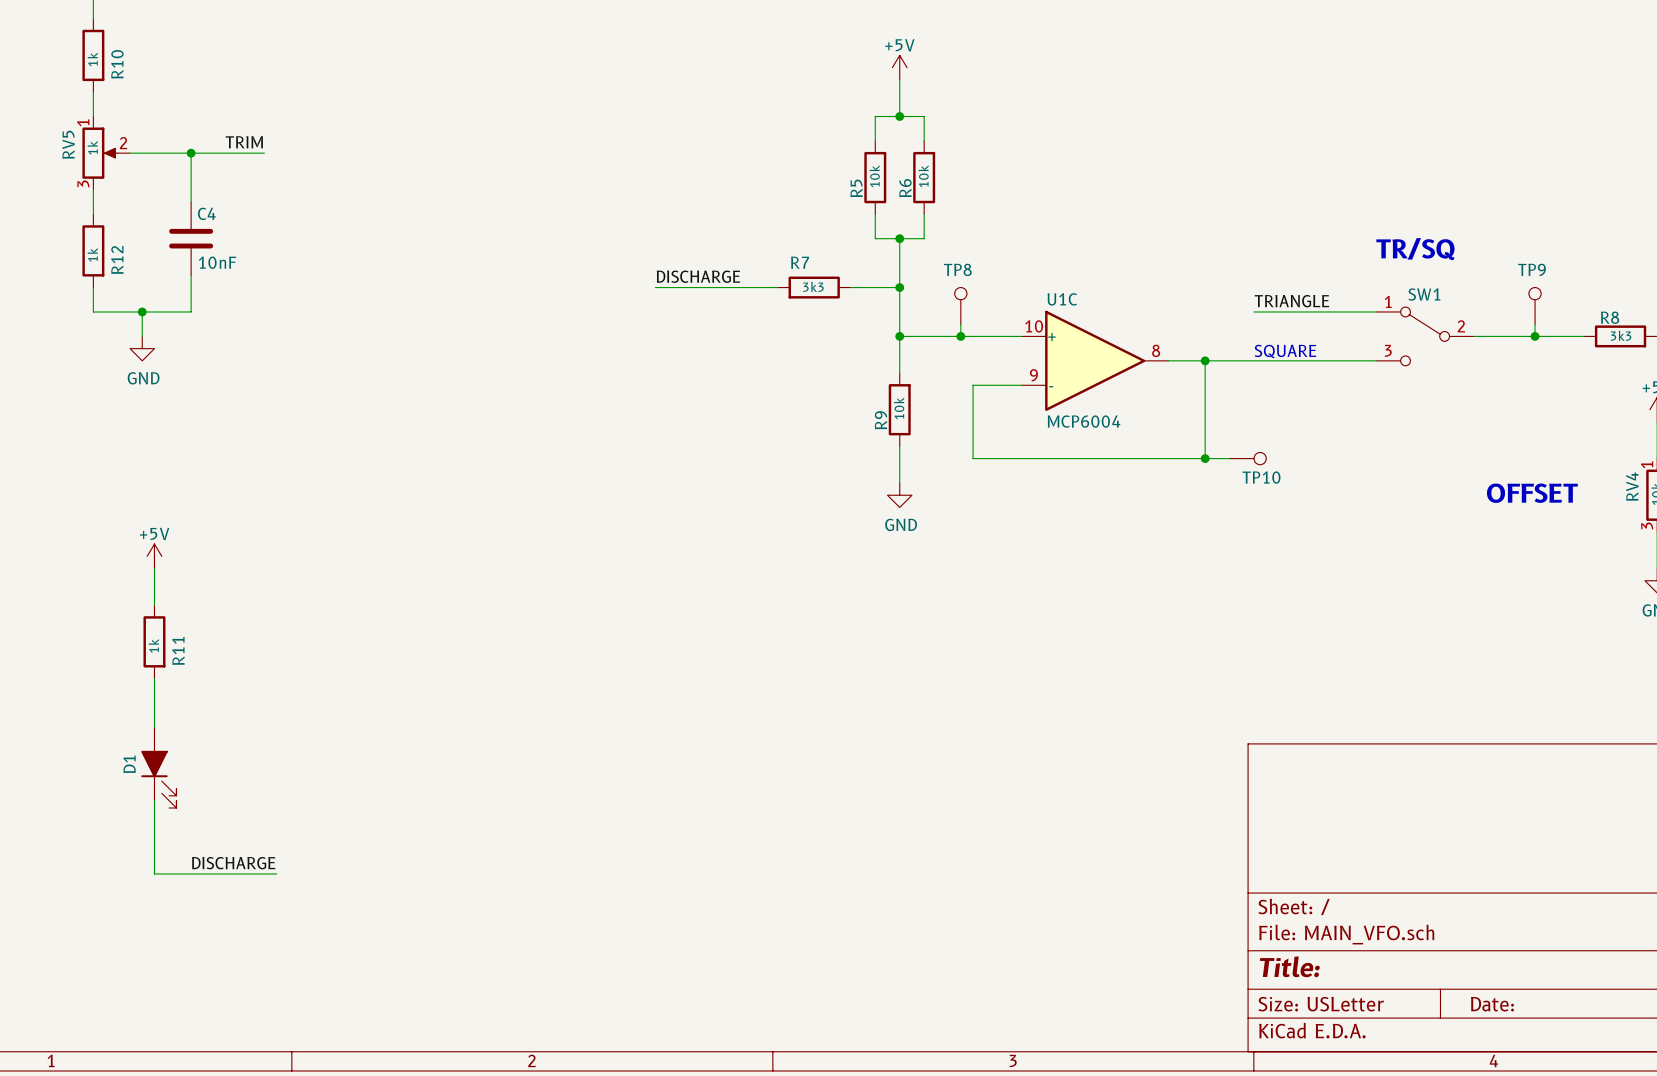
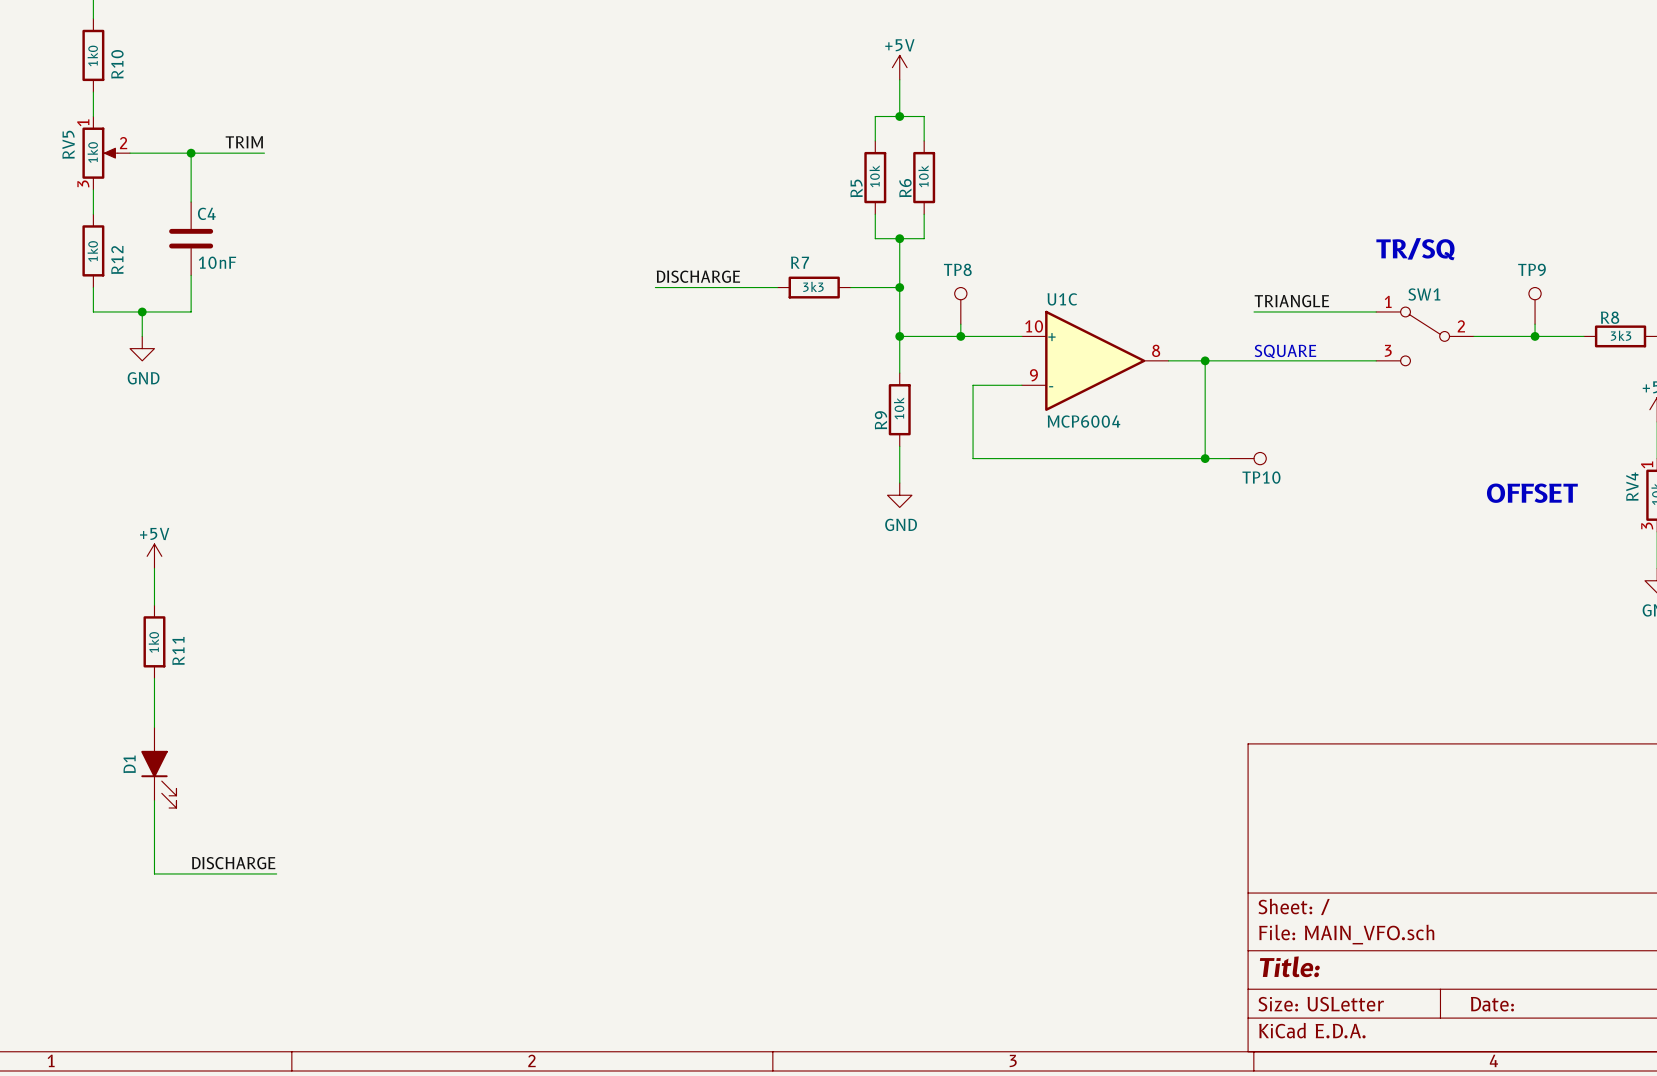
R10 value: 1k (92, 59) -> 1k0 (92, 56)
RV5 value: 1k (92, 147) -> 1k0 (92, 152)
R12 value: 1k (92, 254) -> 1k0 (92, 251)
R11 value: 1k (153, 645) -> 1k0 (153, 642)

